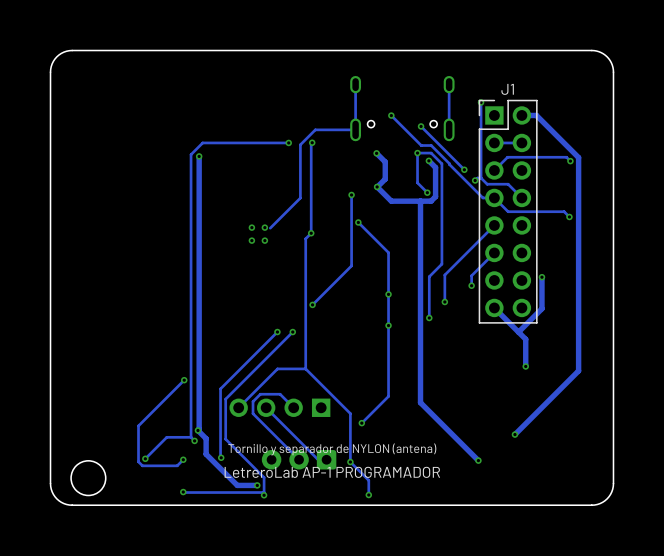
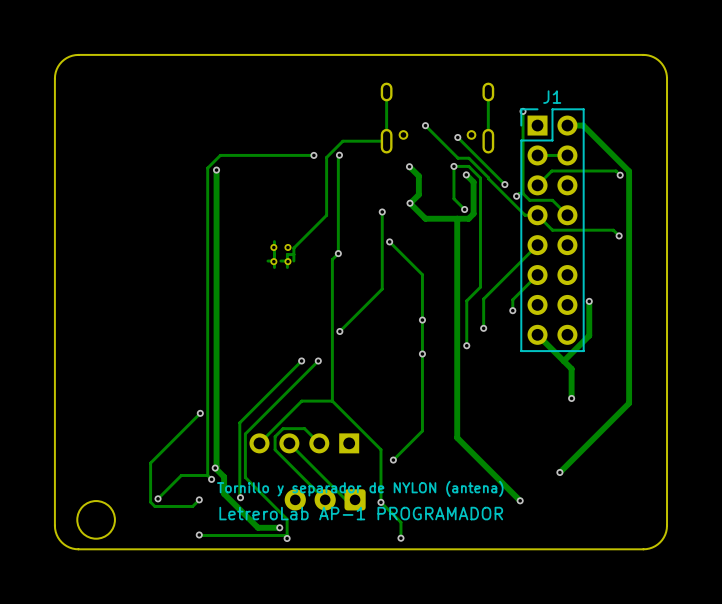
track: none -> (274, 241) (274, 267)
track: none -> (293, 248) (293, 261)
track: none -> (293, 254) (287, 254) (287, 267)
track: none -> (274, 261) (267, 261)
track: none -> (287, 261) (280, 261)

